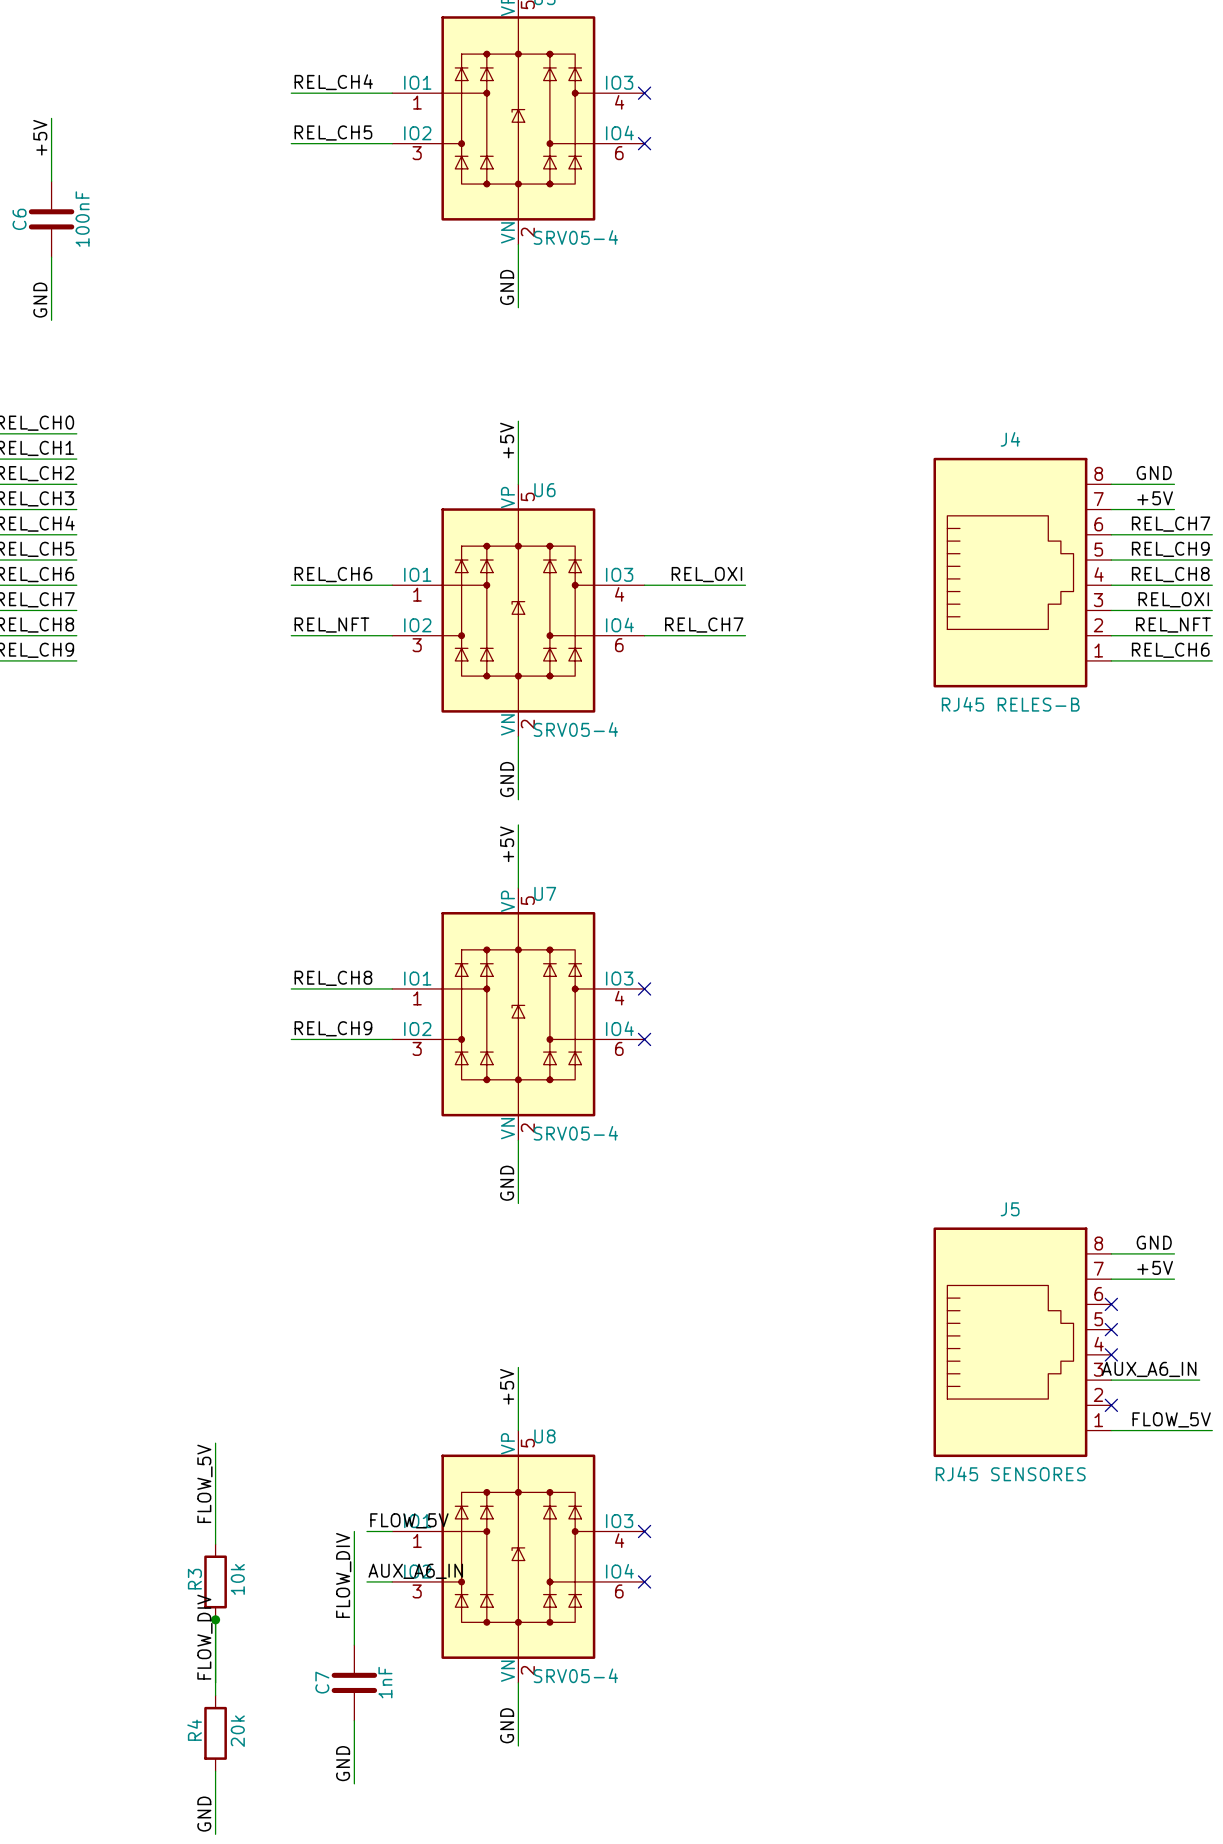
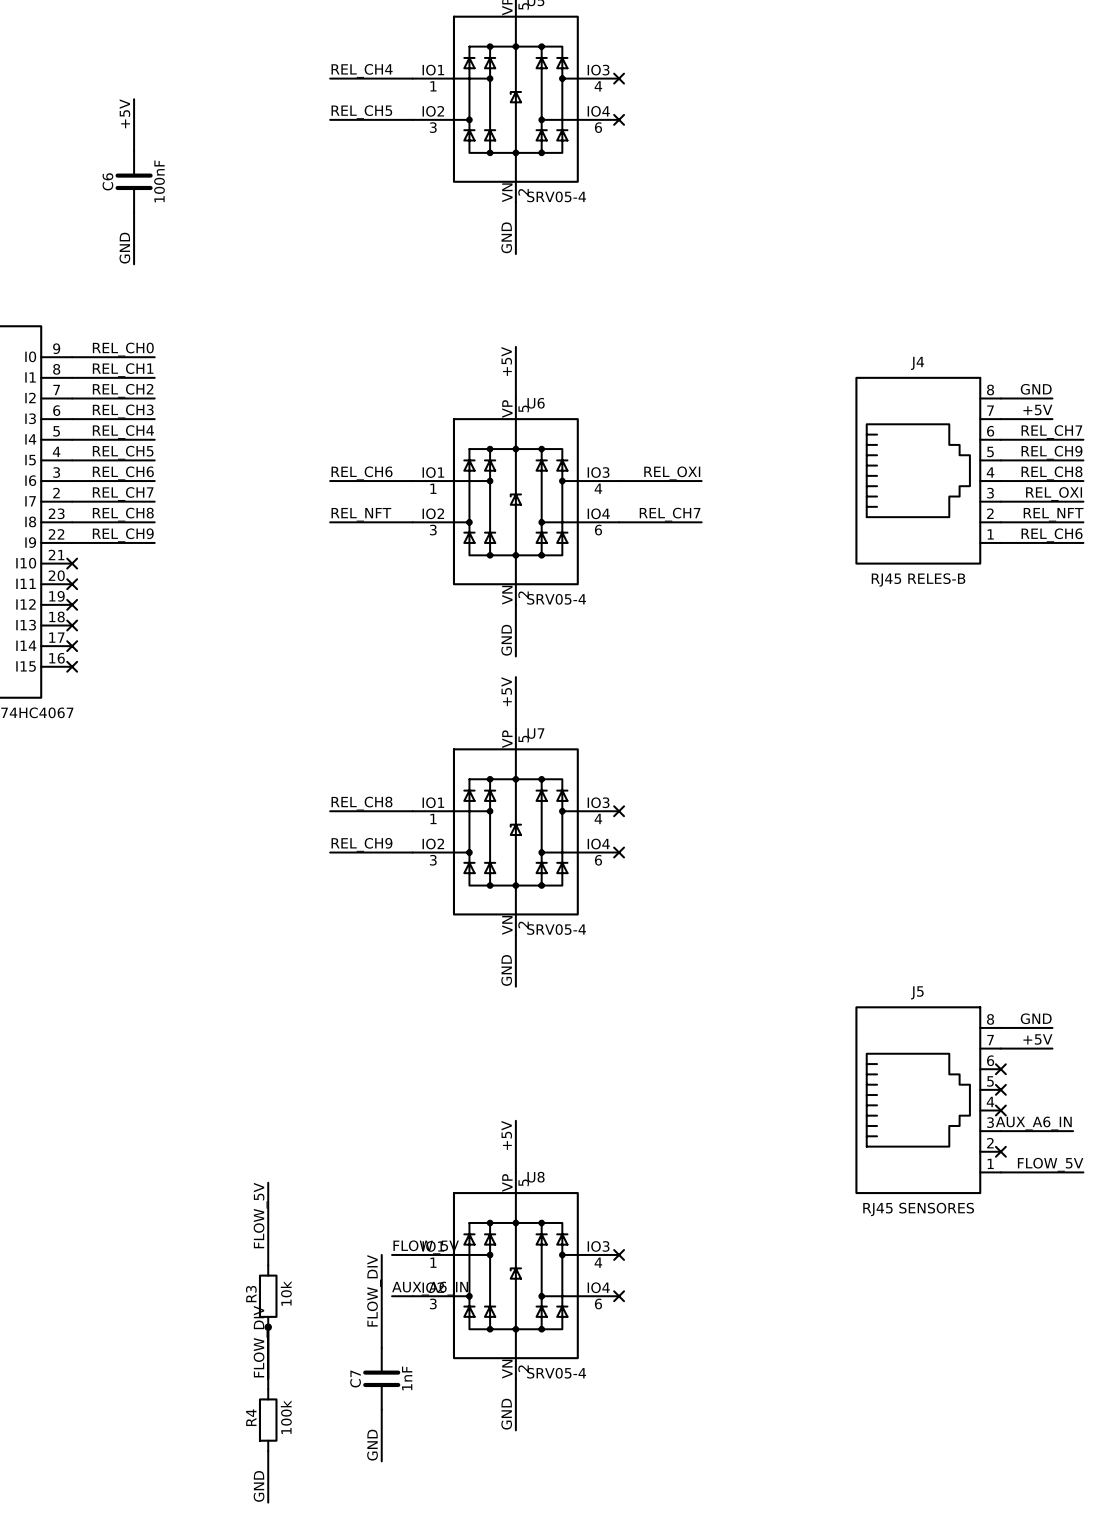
R4 value: 20k (237, 1731) -> 100k (286, 1417)

